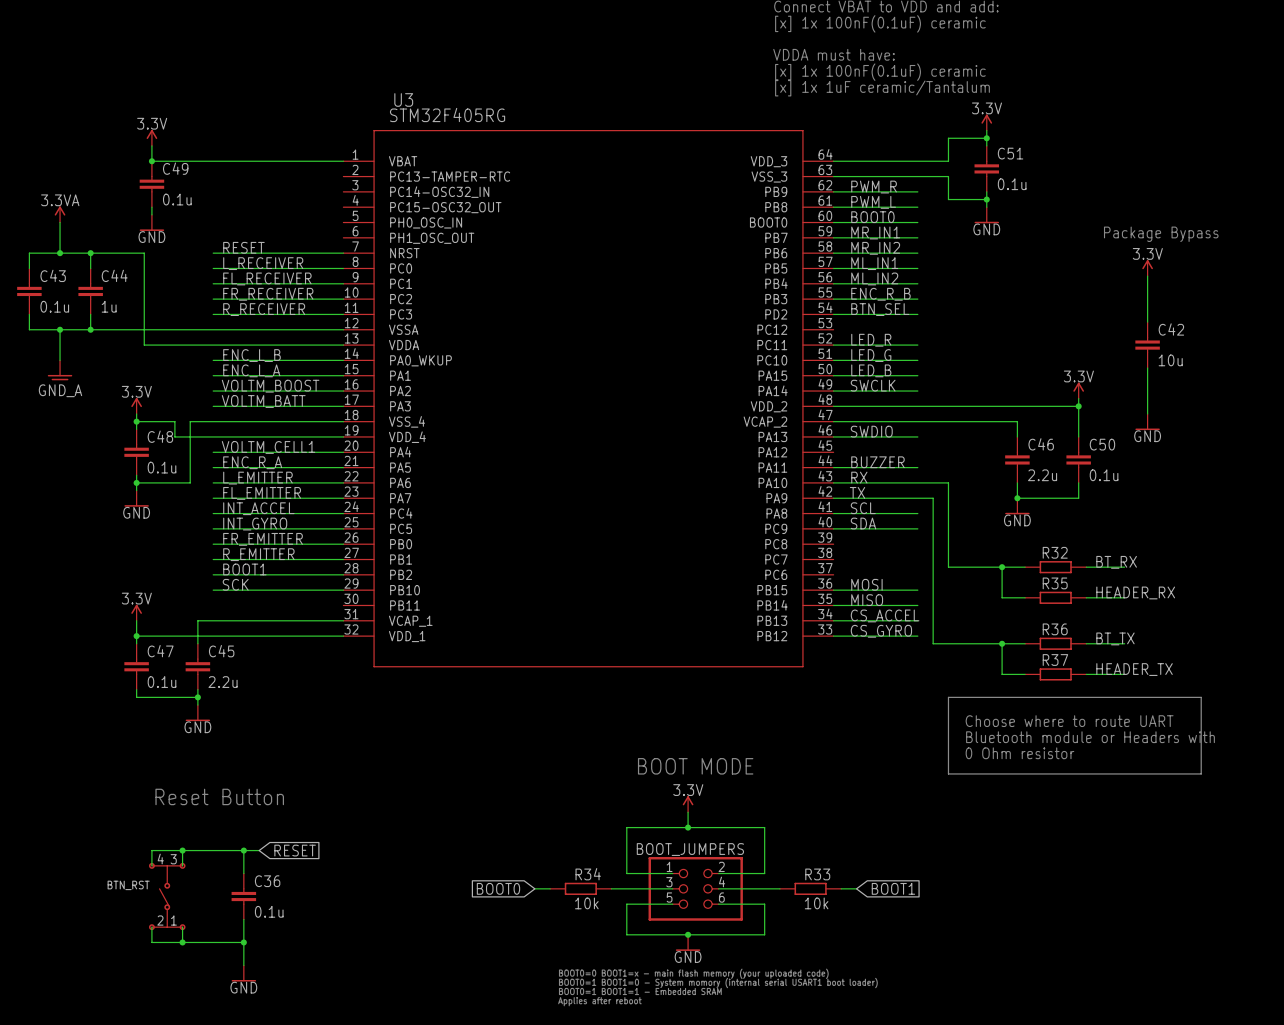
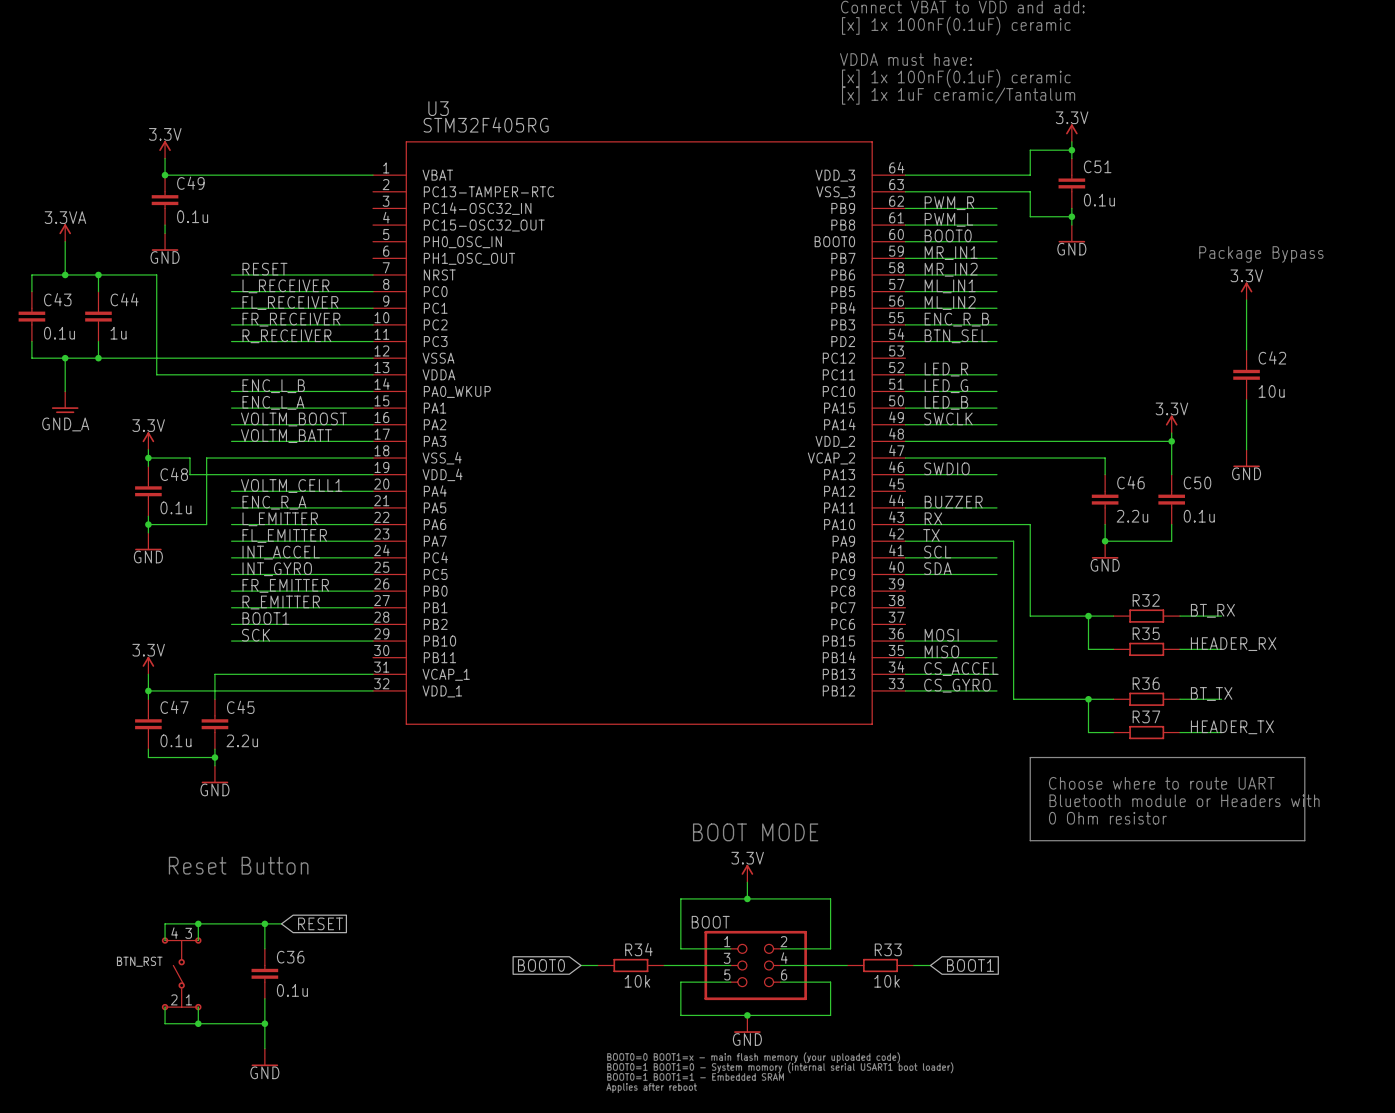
BOOT_JUMPERS name: BOOT_JUMPERS (690, 849) -> BOOT (710, 922)

